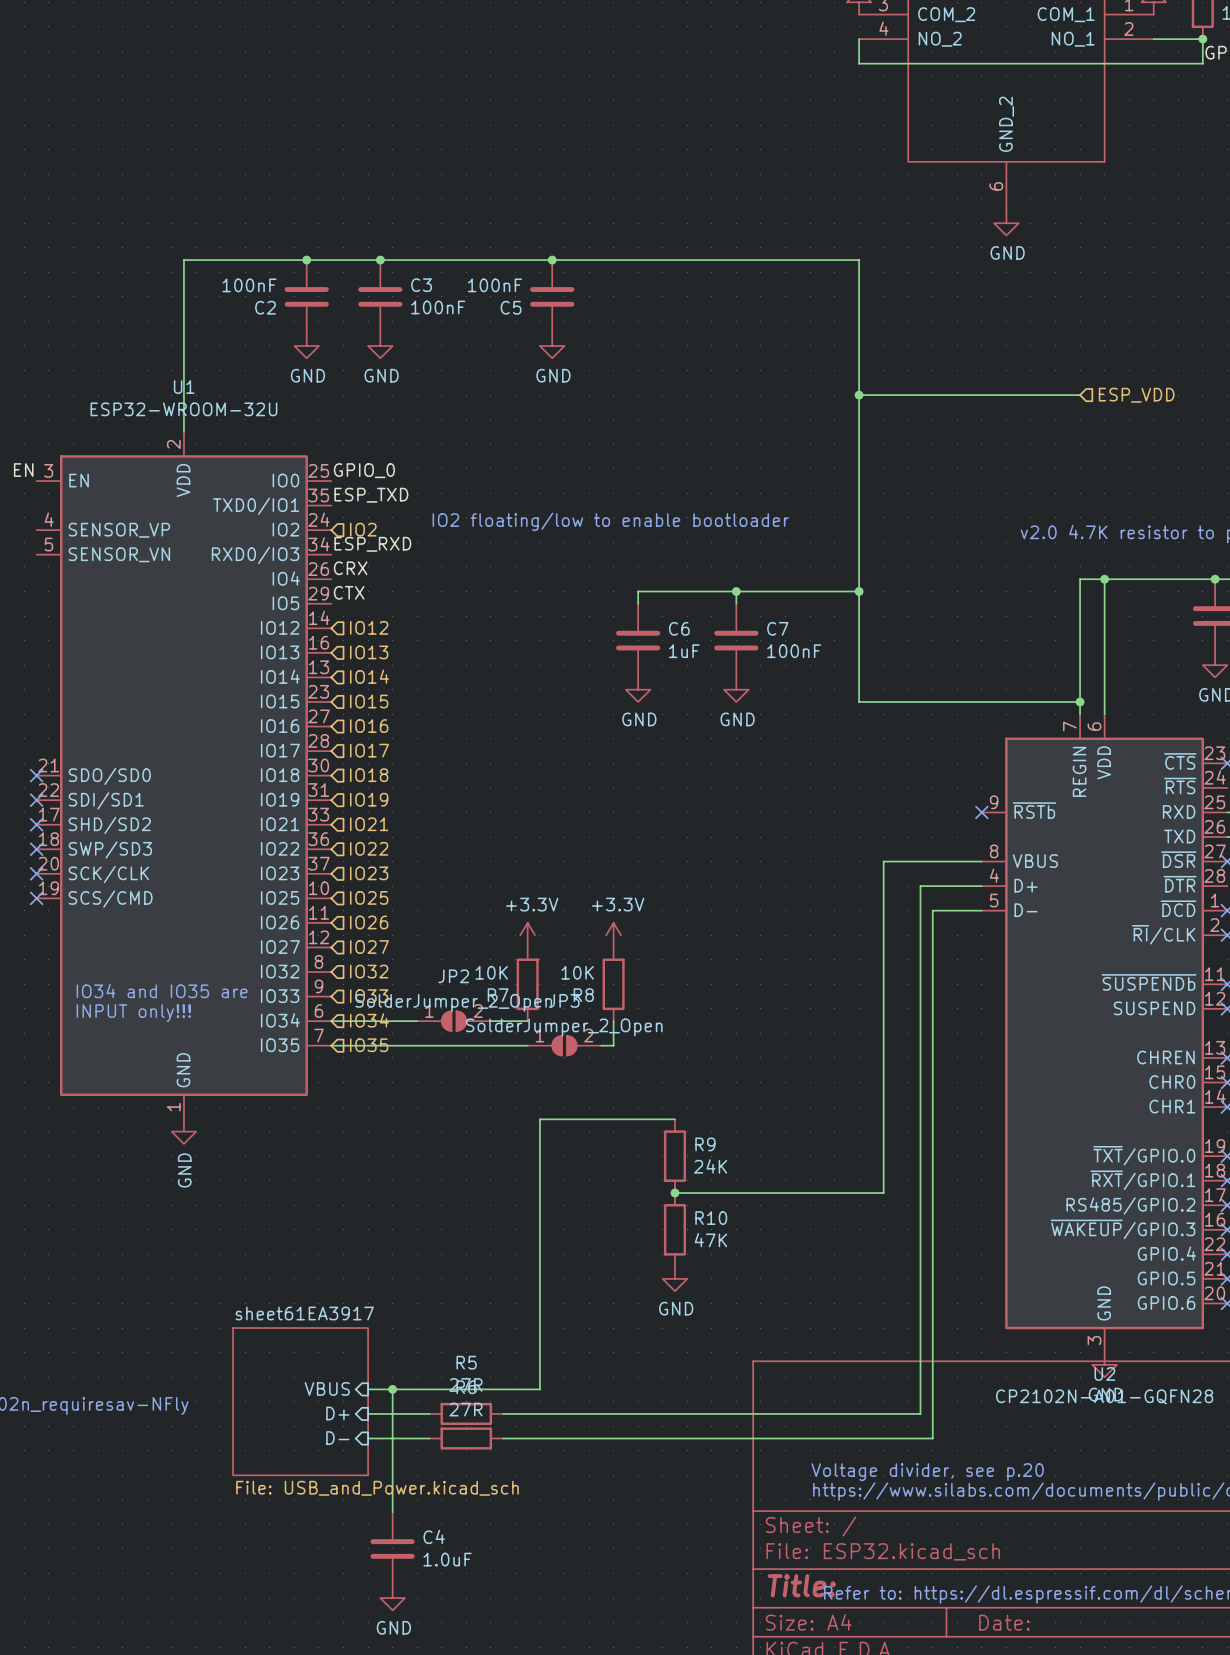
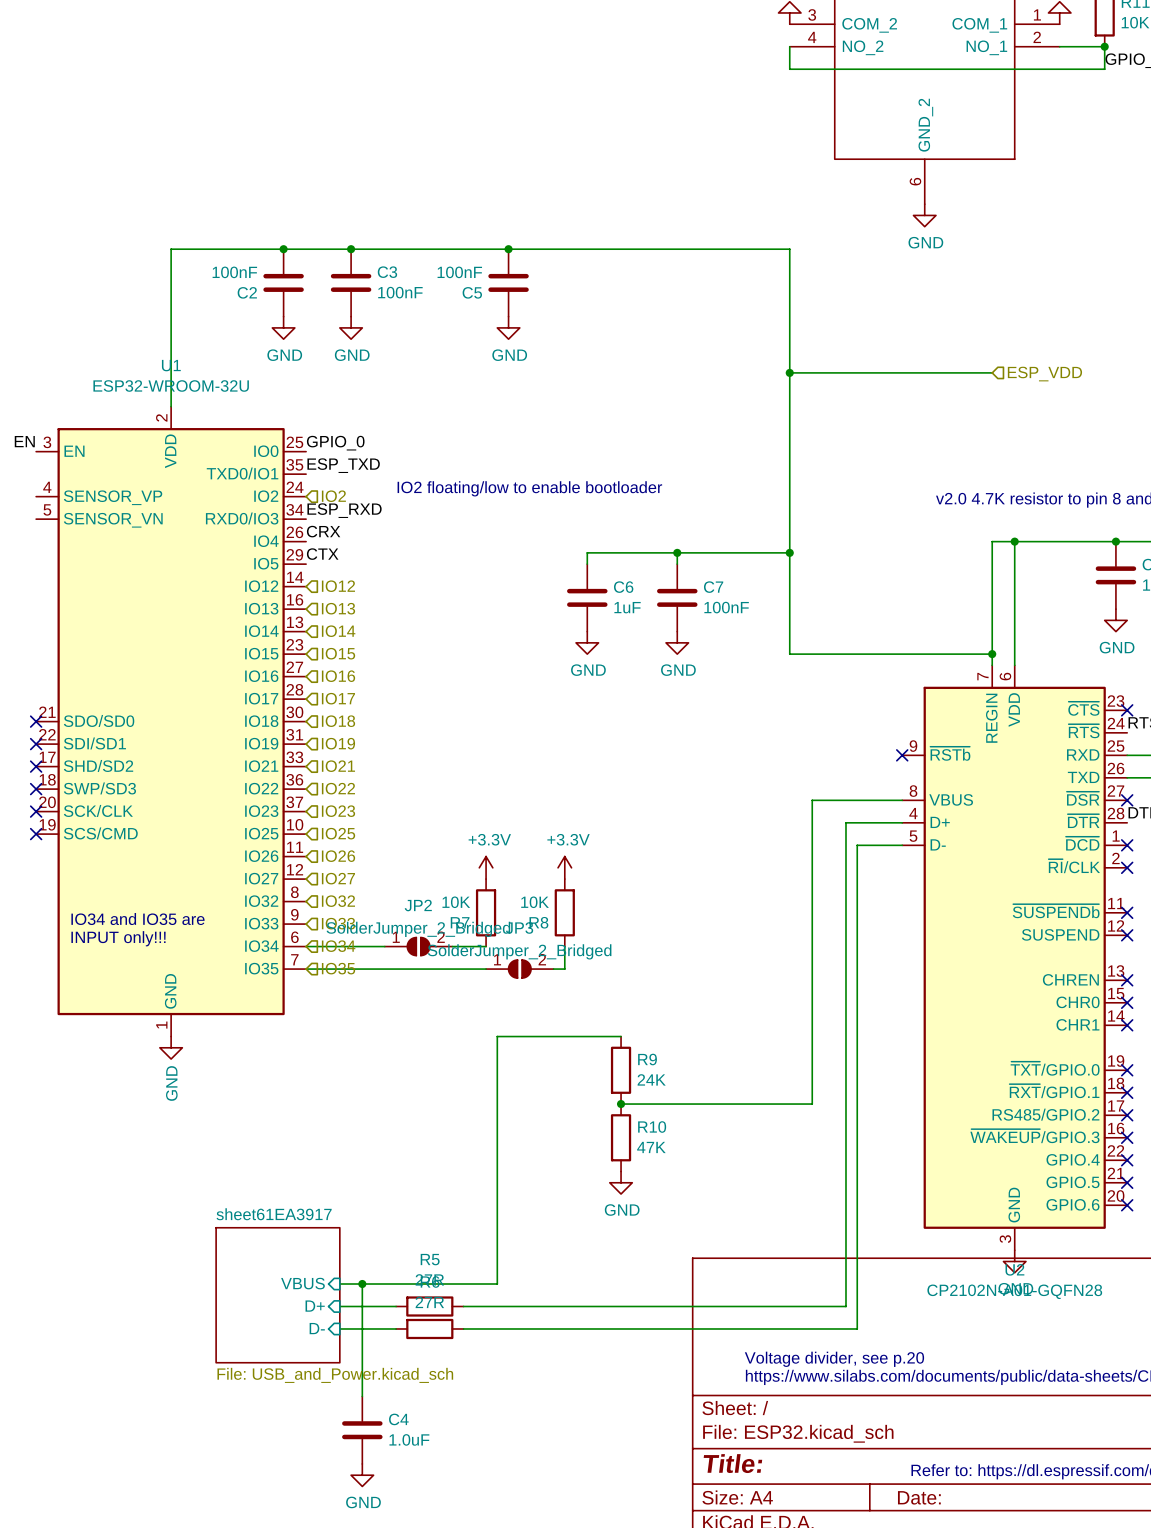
JP2 value: SolderJumper_2_Open (453, 1002) -> SolderJumper_2_Bridged (418, 929)
JP3 value: SolderJumper_2_Open (564, 1027) -> SolderJumper_2_Bridged (519, 951)

